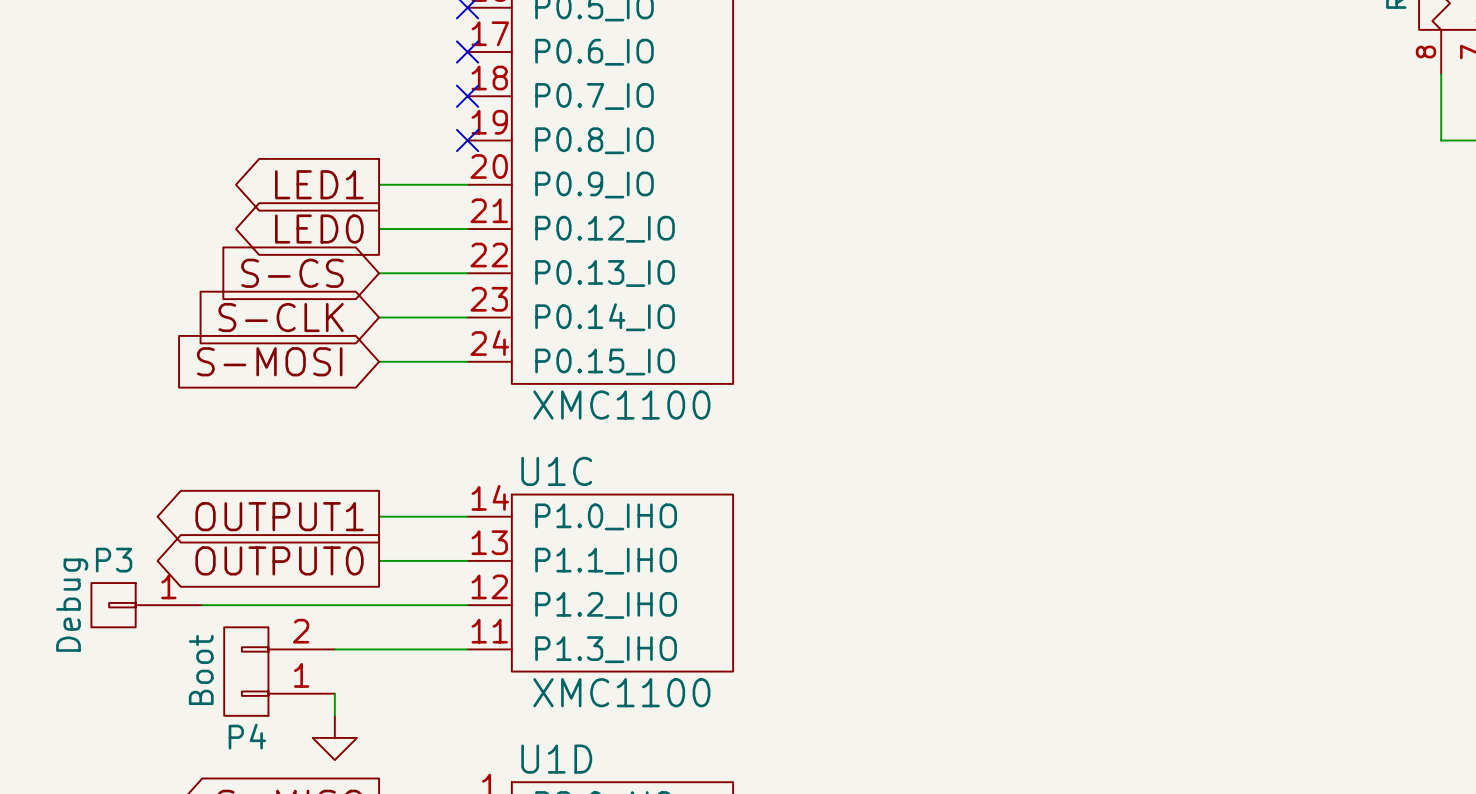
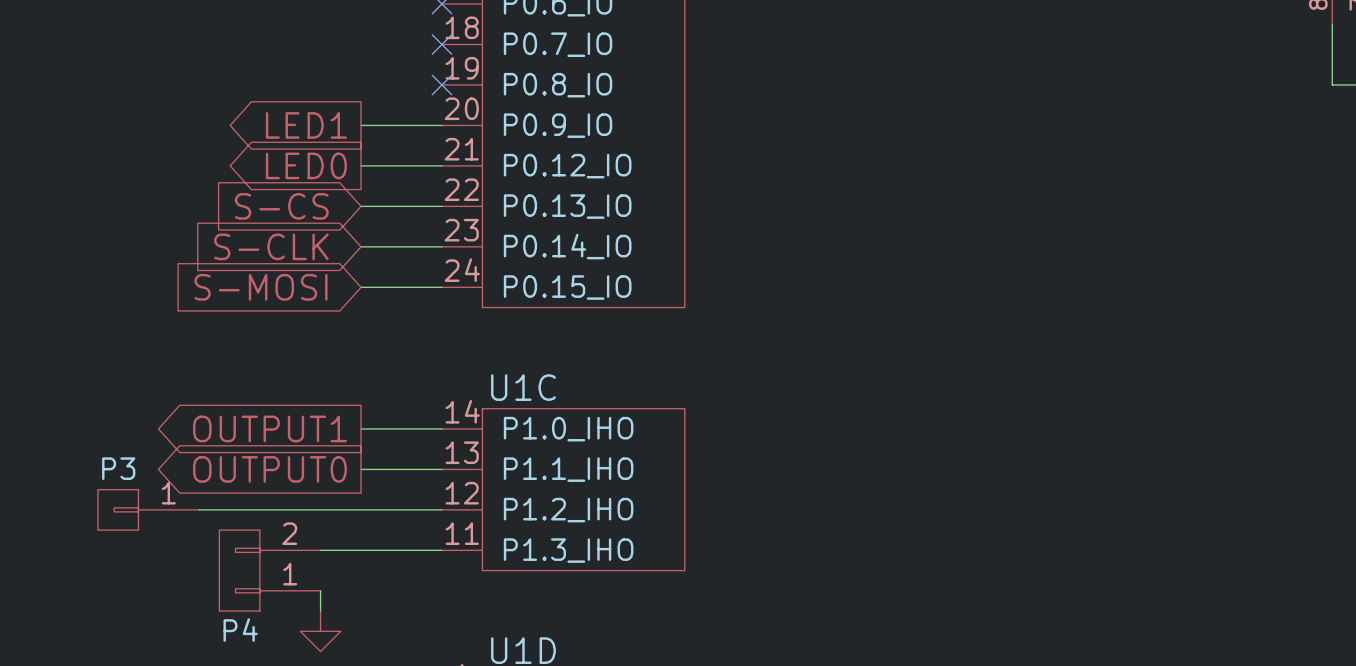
part value: XMC1100 (621, 405) -> none
P3 value: Debug (72, 605) -> none
P4 value: Boot (201, 669) -> none
U1C value: XMC1100 (621, 692) -> none

